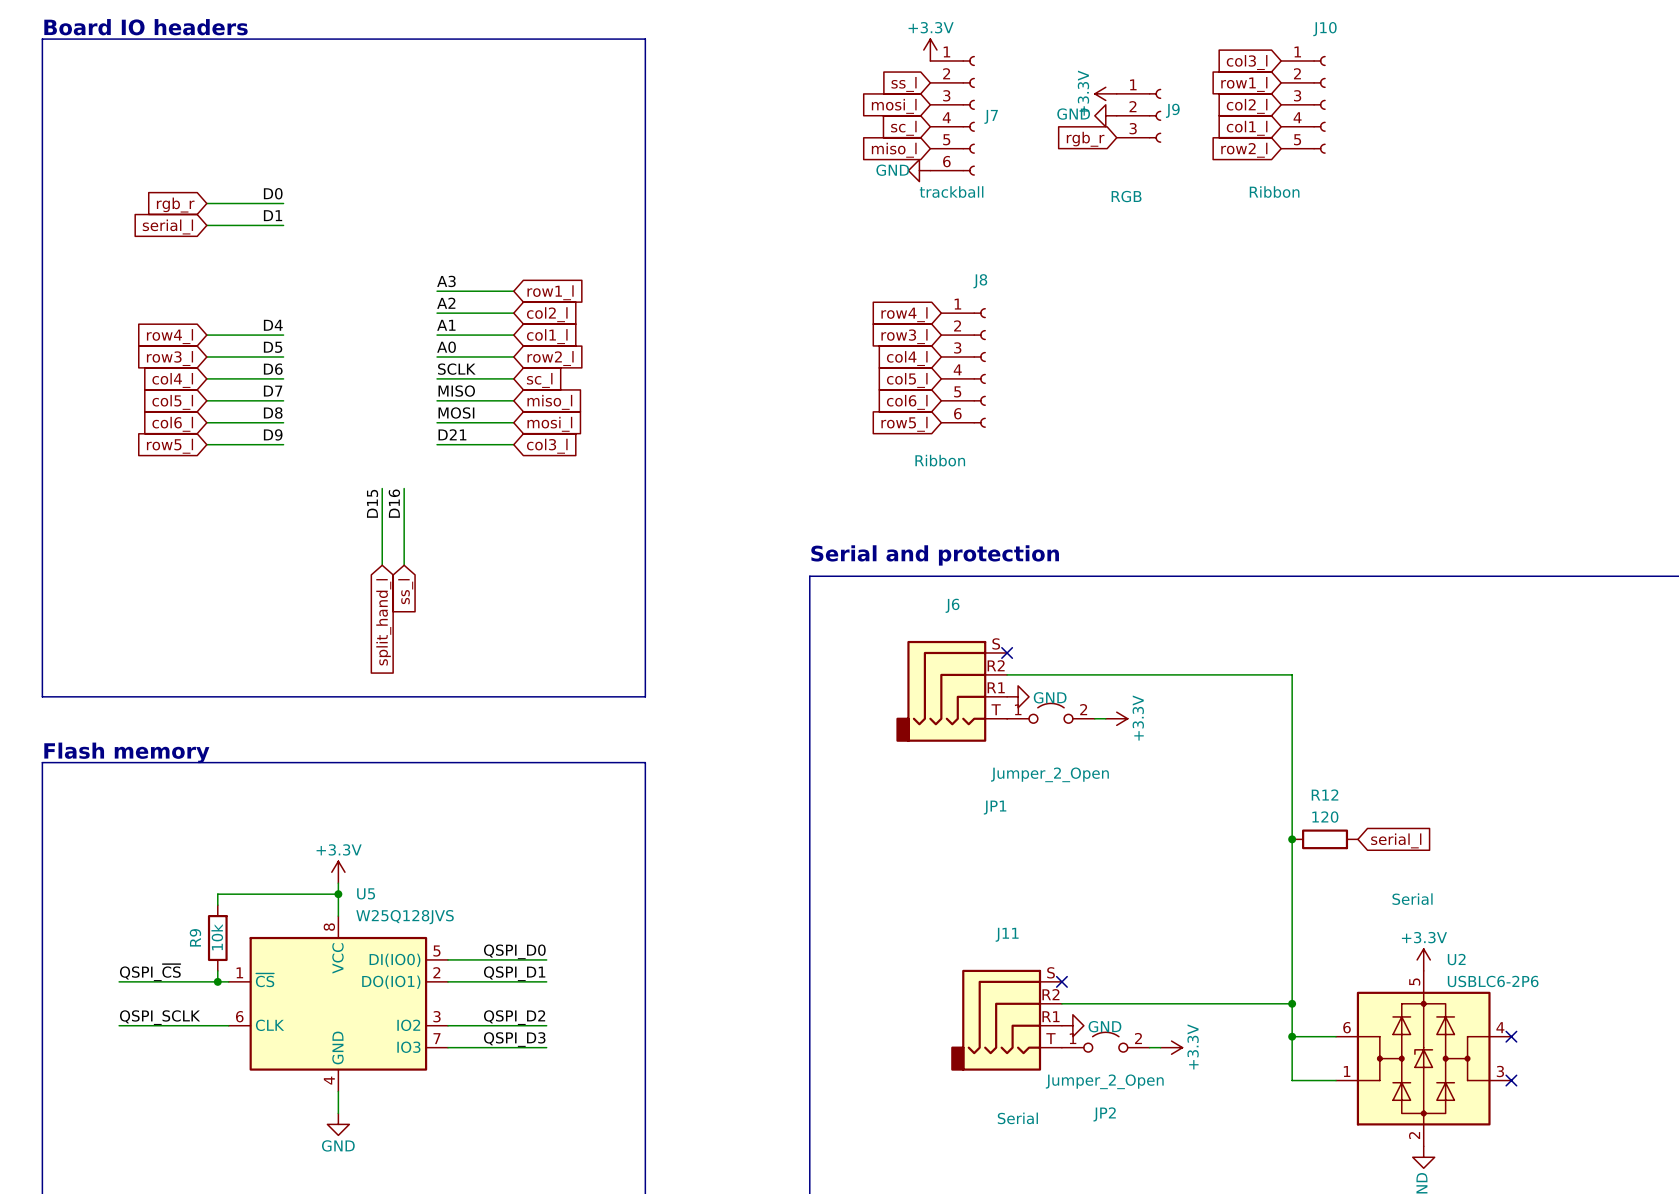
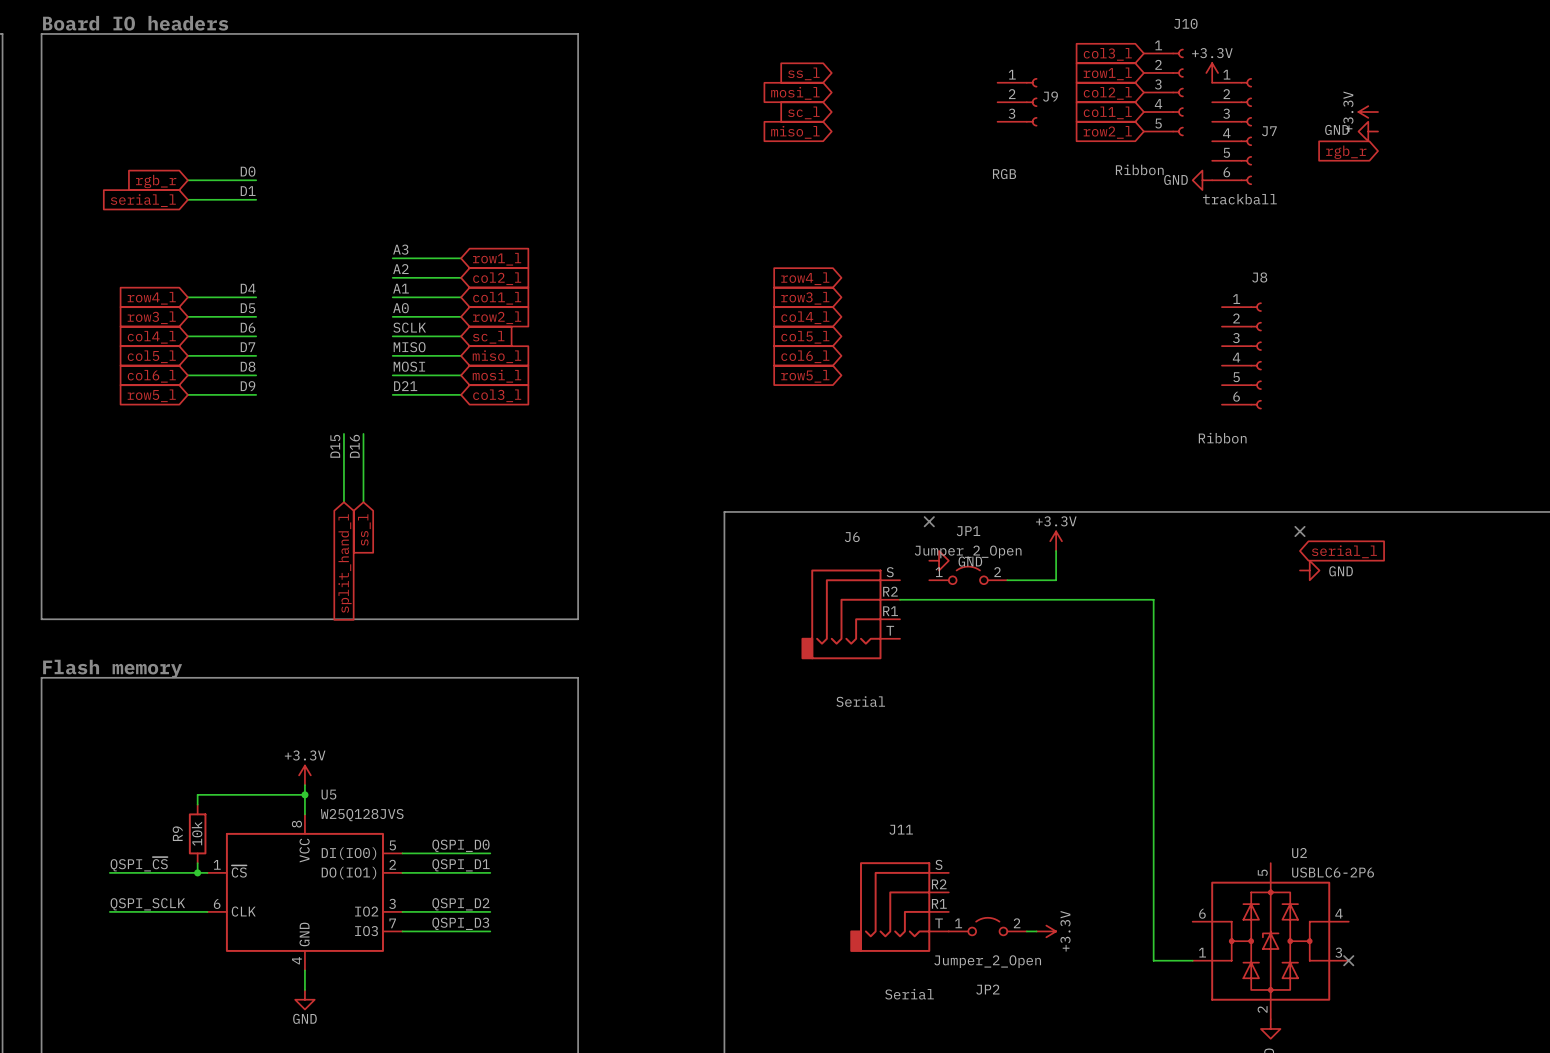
power symbol: +3.3V (930, 50) -> none
power symbol: none -> +3.3V (1212, 72)
power symbol: +3.3V (1105, 93) -> none
J7 position: (952, 115) -> (1231, 131)
power symbol: GND (1105, 115) -> none
power symbol: none -> +3.3V (1368, 112)
global label: rgb_r (1085, 139) -> none
power symbol: none -> GND (1368, 131)
power symbol: GND (919, 170) -> none
global label: none -> rgb_r (1346, 152)
power symbol: none -> GND (1202, 180)
J8 position: (963, 367) -> (1241, 355)
text: Serial and protection (935, 555) -> none
no-connect mark: none -> (929, 521)
no-connect mark: none -> (1299, 531)
wire: none -> (1056, 550) (1056, 580) (1007, 580)
global label: none -> serial_l (1344, 551)
power symbol: none -> GND (1309, 570)
no-connect mark: (1007, 652) -> none
power symbol position: GND (1018, 696) -> GND (939, 560)
JP1 position: (1050, 713) -> (968, 575)
wire: (1094, 718) (1105, 718) -> none
power symbol rotation: 0° (1116, 718) -> 90° counterclockwise (1056, 541)
power symbol position: +3.3V (1116, 718) -> +3.3V (1056, 541)
JP1 value position: Jumper_2_Open (1049, 774) -> Jumper_2_Open (968, 551)
JP1 name position: JP1 (995, 807) -> JP1 (968, 531)
junction: (1292, 839) -> none
R12: 120 (1325, 839) -> none
global label: serial_l (1396, 840) -> none
J6 value position: Serial (1412, 899) -> Serial (860, 701)
power symbol: +3.3V (1423, 959) -> none
no-connect mark: (1061, 981) -> none
wire: (1061, 1003) (1292, 1003) -> none
junction: (1292, 1003) -> none
power symbol: GND (1072, 1025) -> none
wire: (1292, 1036) (1336, 1036) -> none
junction: (1292, 1036) -> none
no-connect mark: (1511, 1036) -> none

